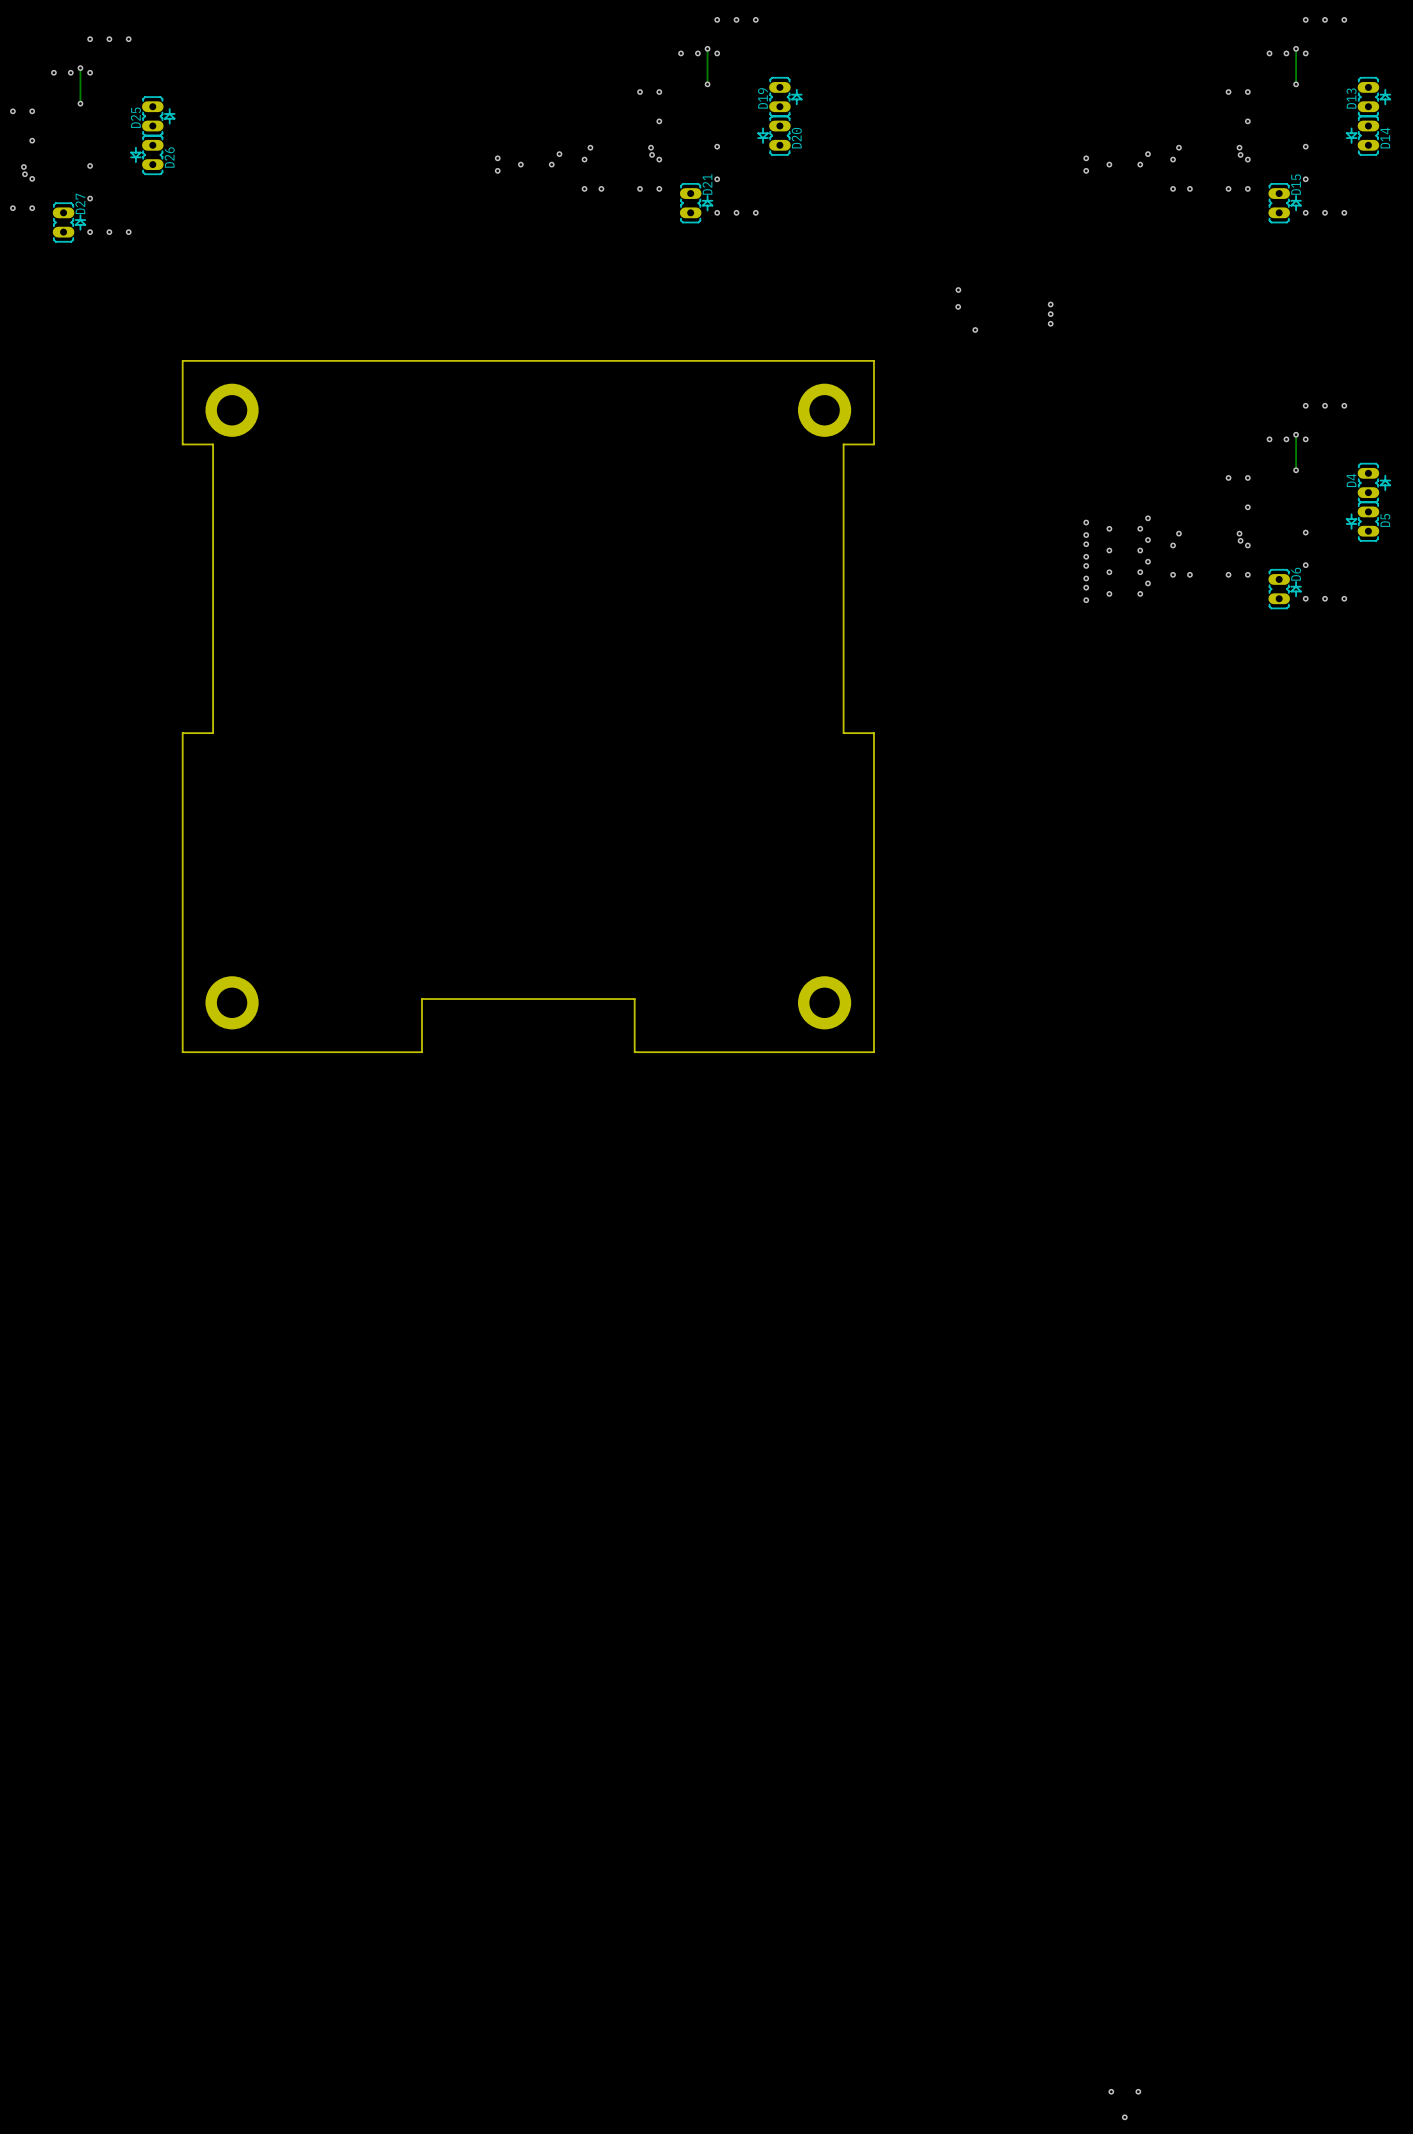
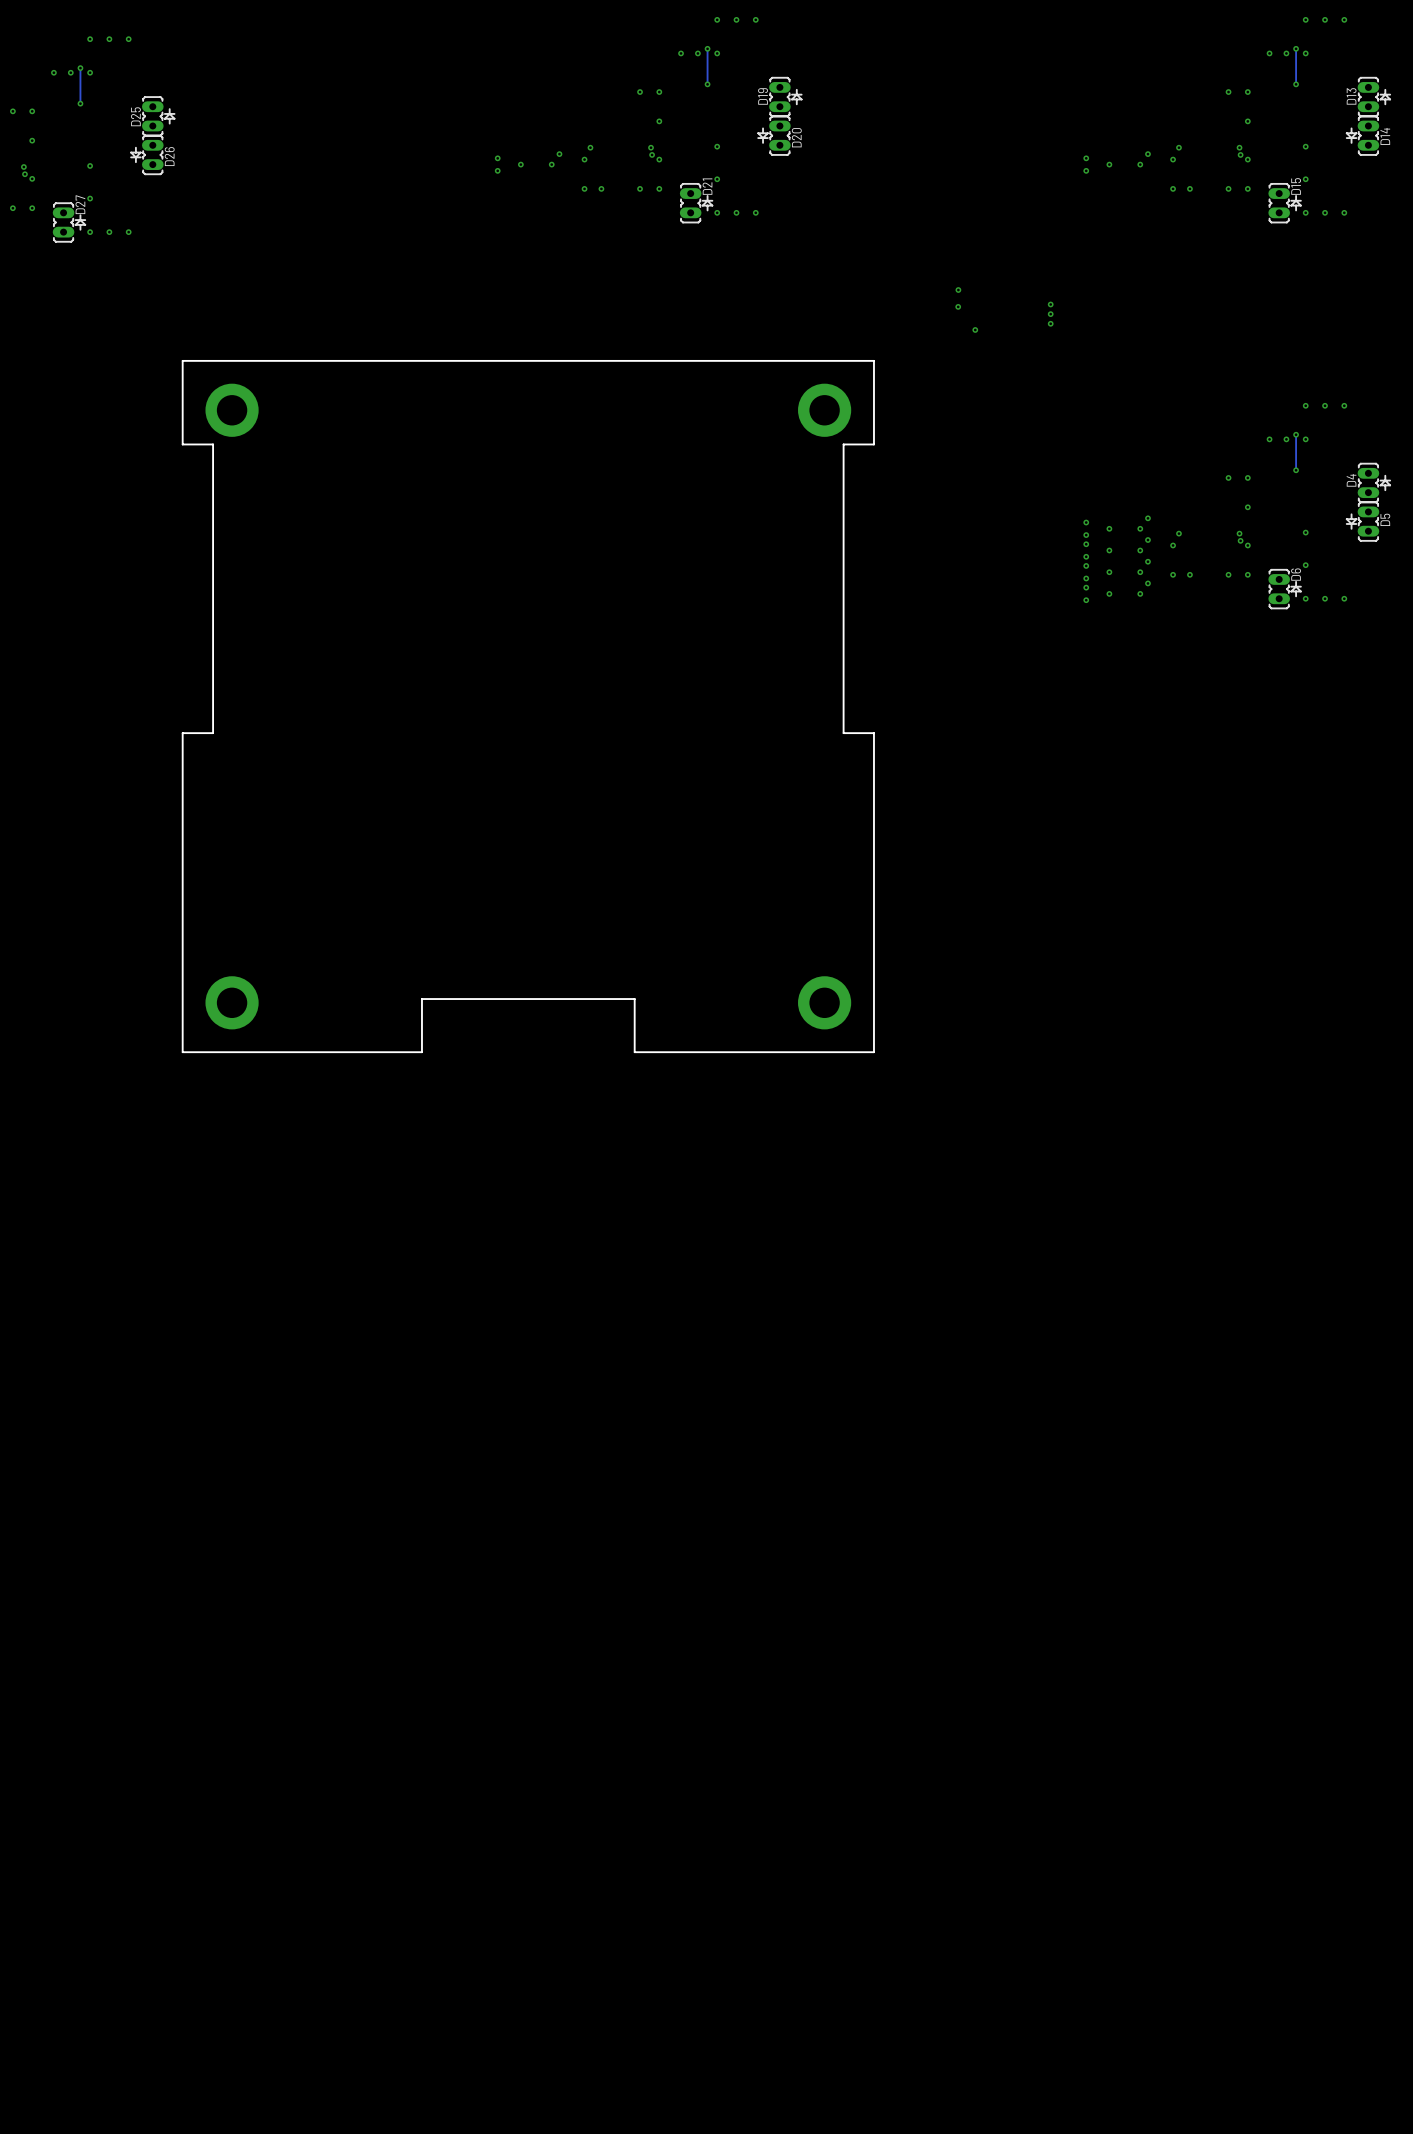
via: (1111, 2091) -> none
via: (1138, 2091) -> none
via: (1124, 2117) -> none

